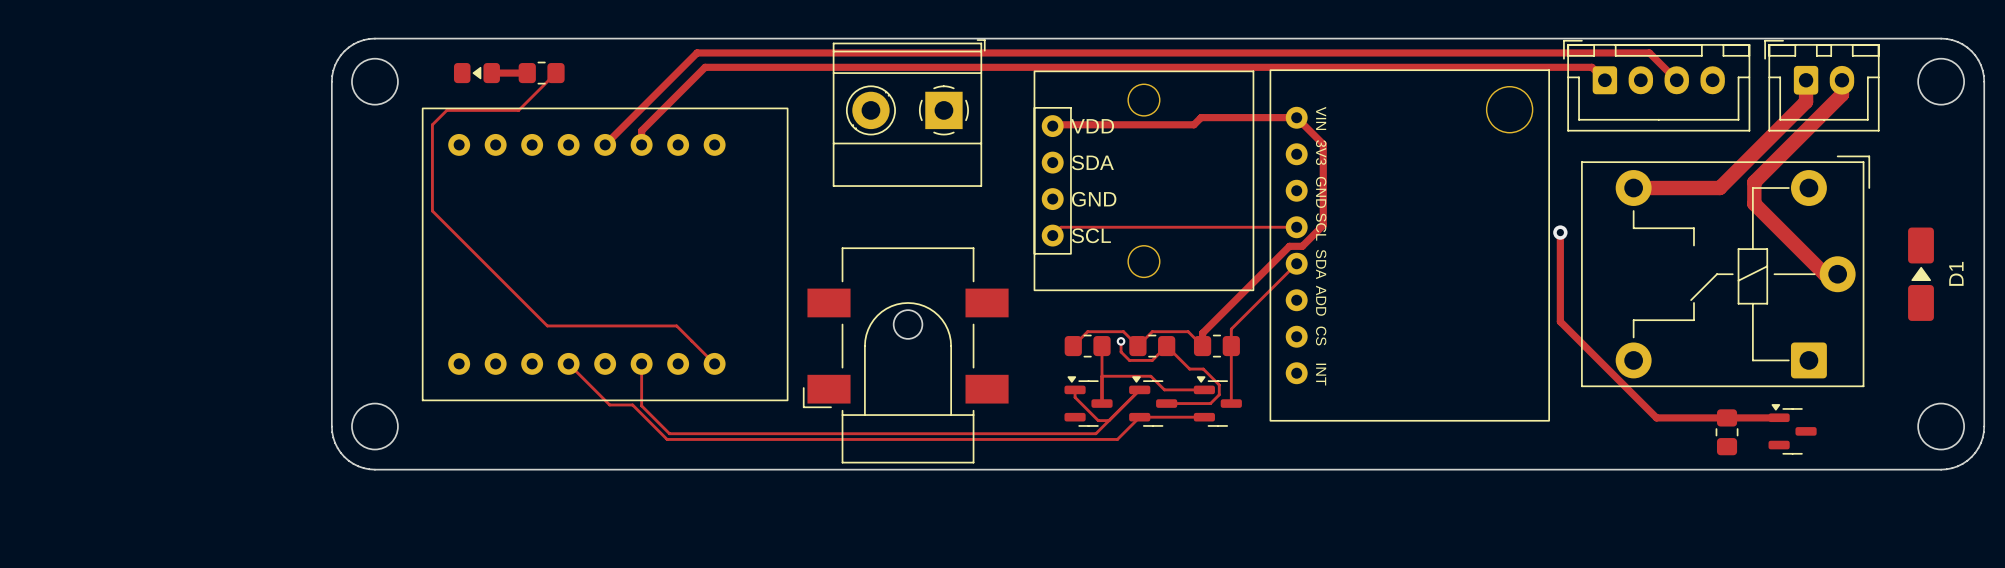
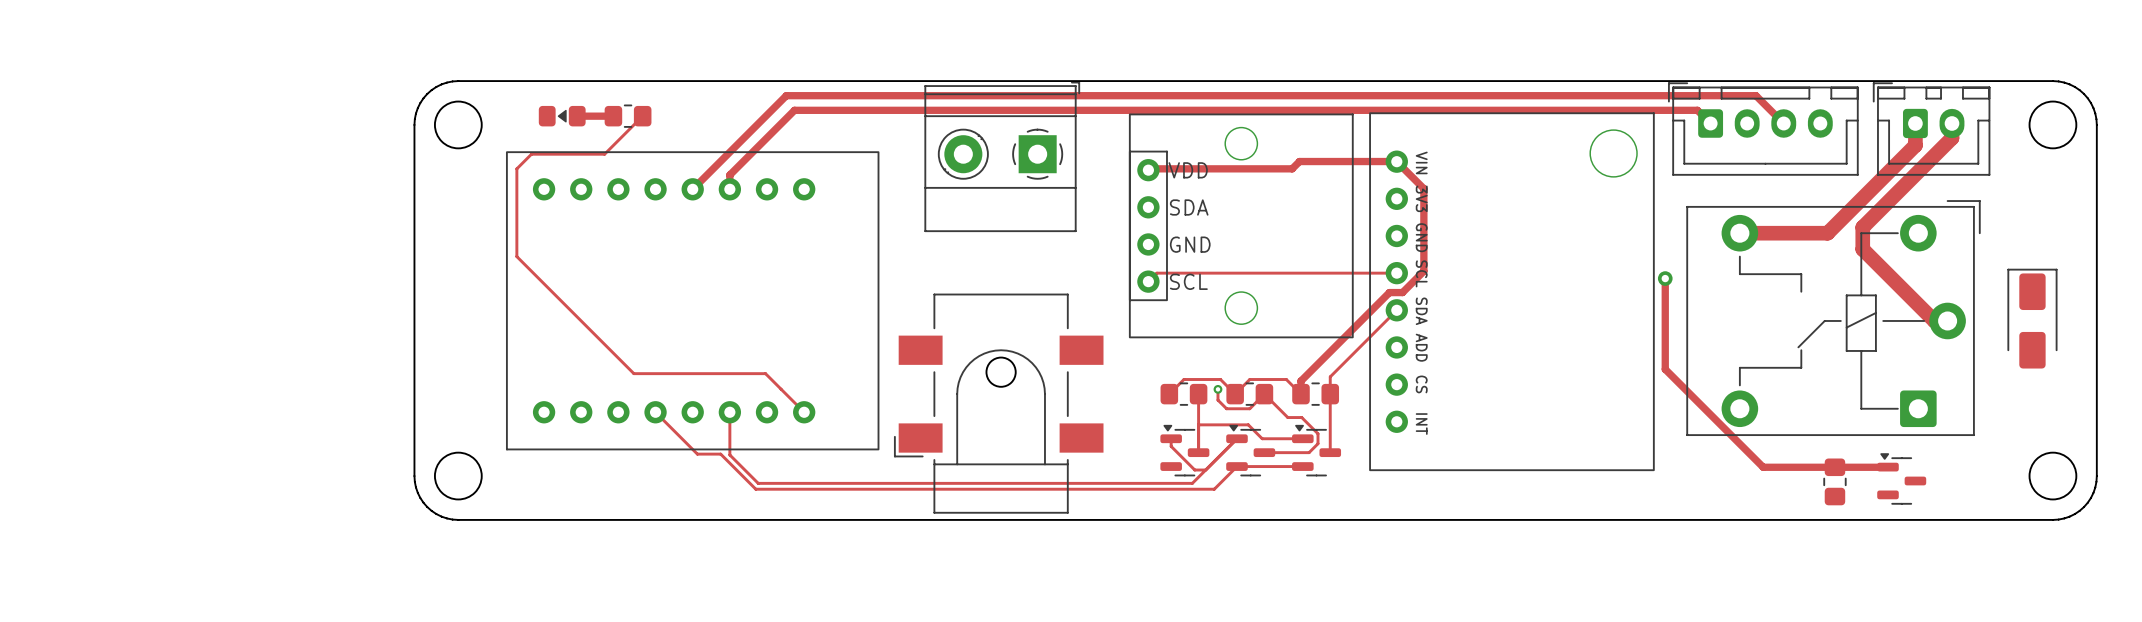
part: none -> (2032, 318)
D1: (1921, 274) -> none

